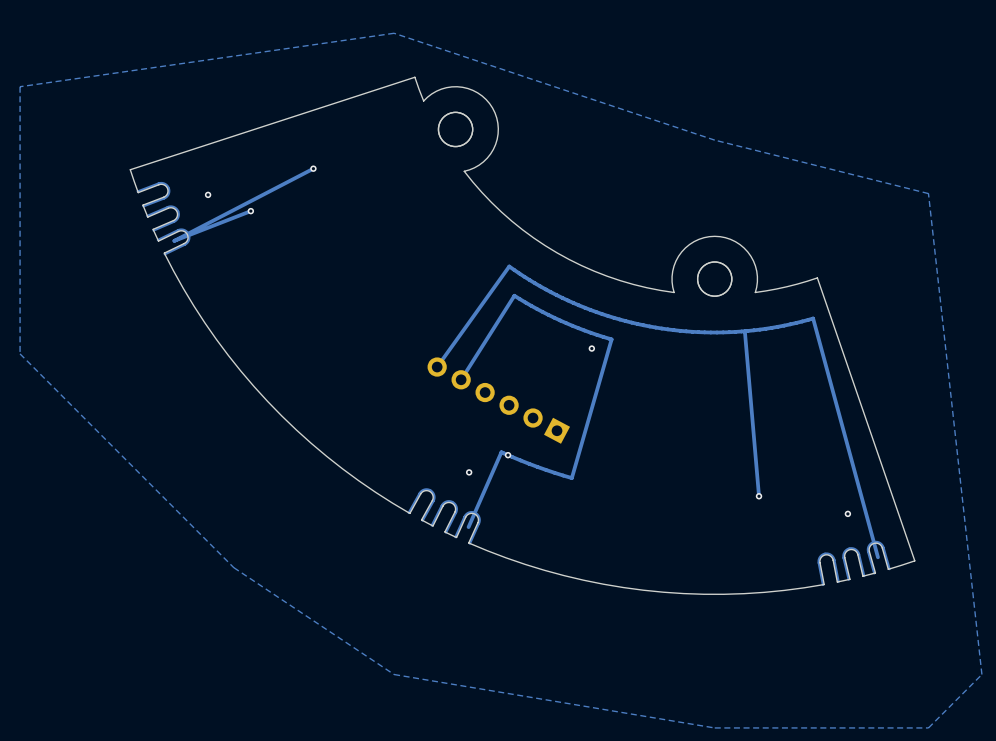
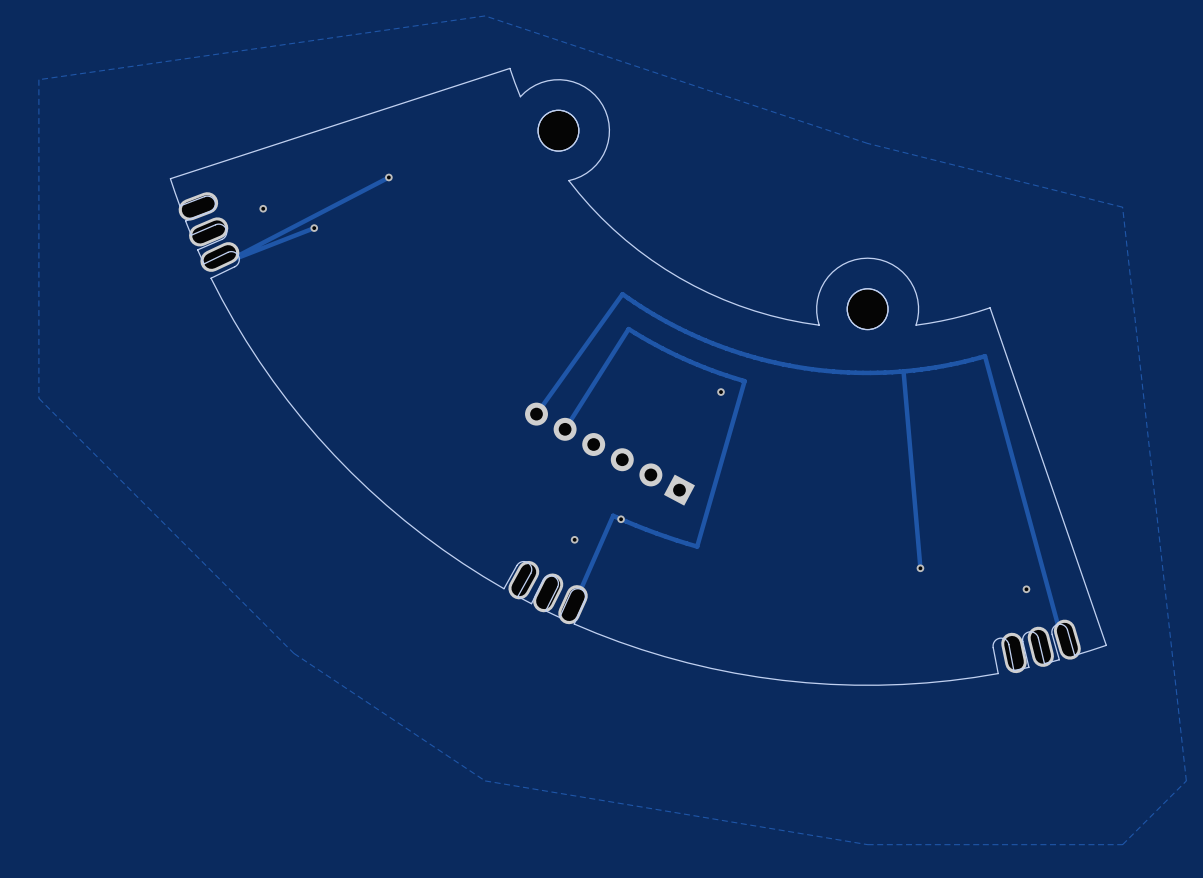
part footprint: [136, 181, 191, 256] -> [178, 192, 240, 272]
part footprint: [407, 488, 481, 545] -> [508, 560, 588, 625]
part footprint: [817, 540, 891, 587] -> [1001, 619, 1081, 674]

